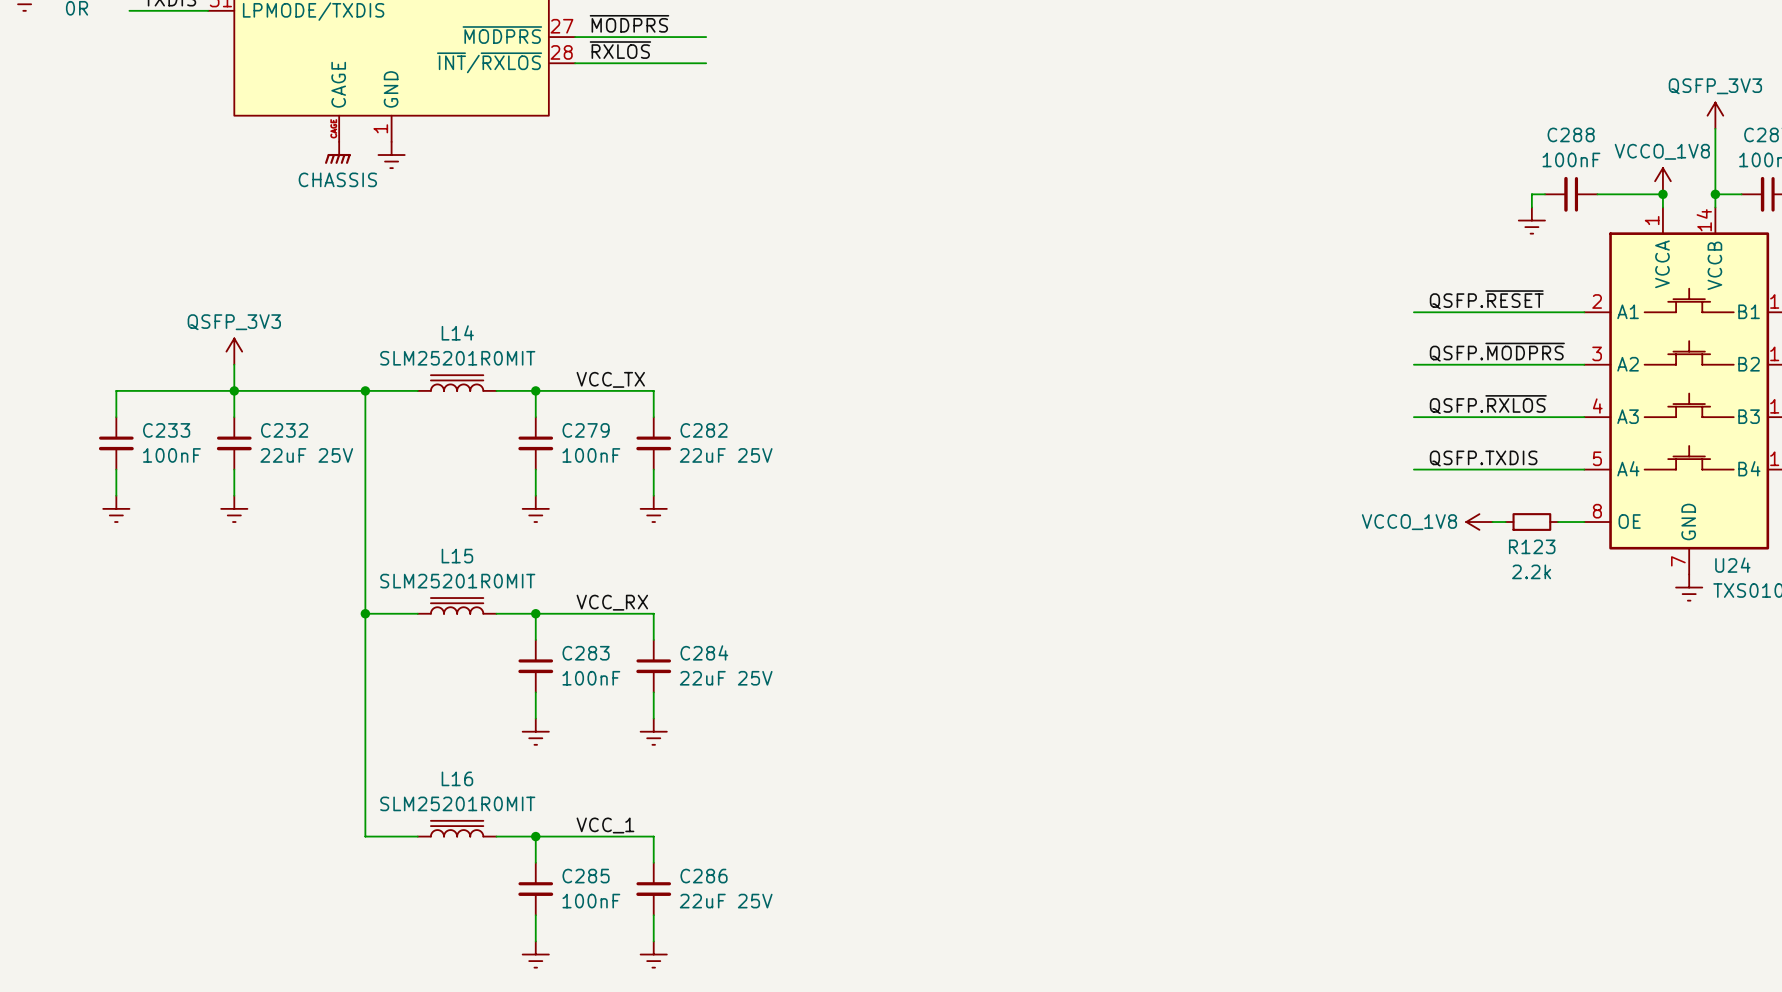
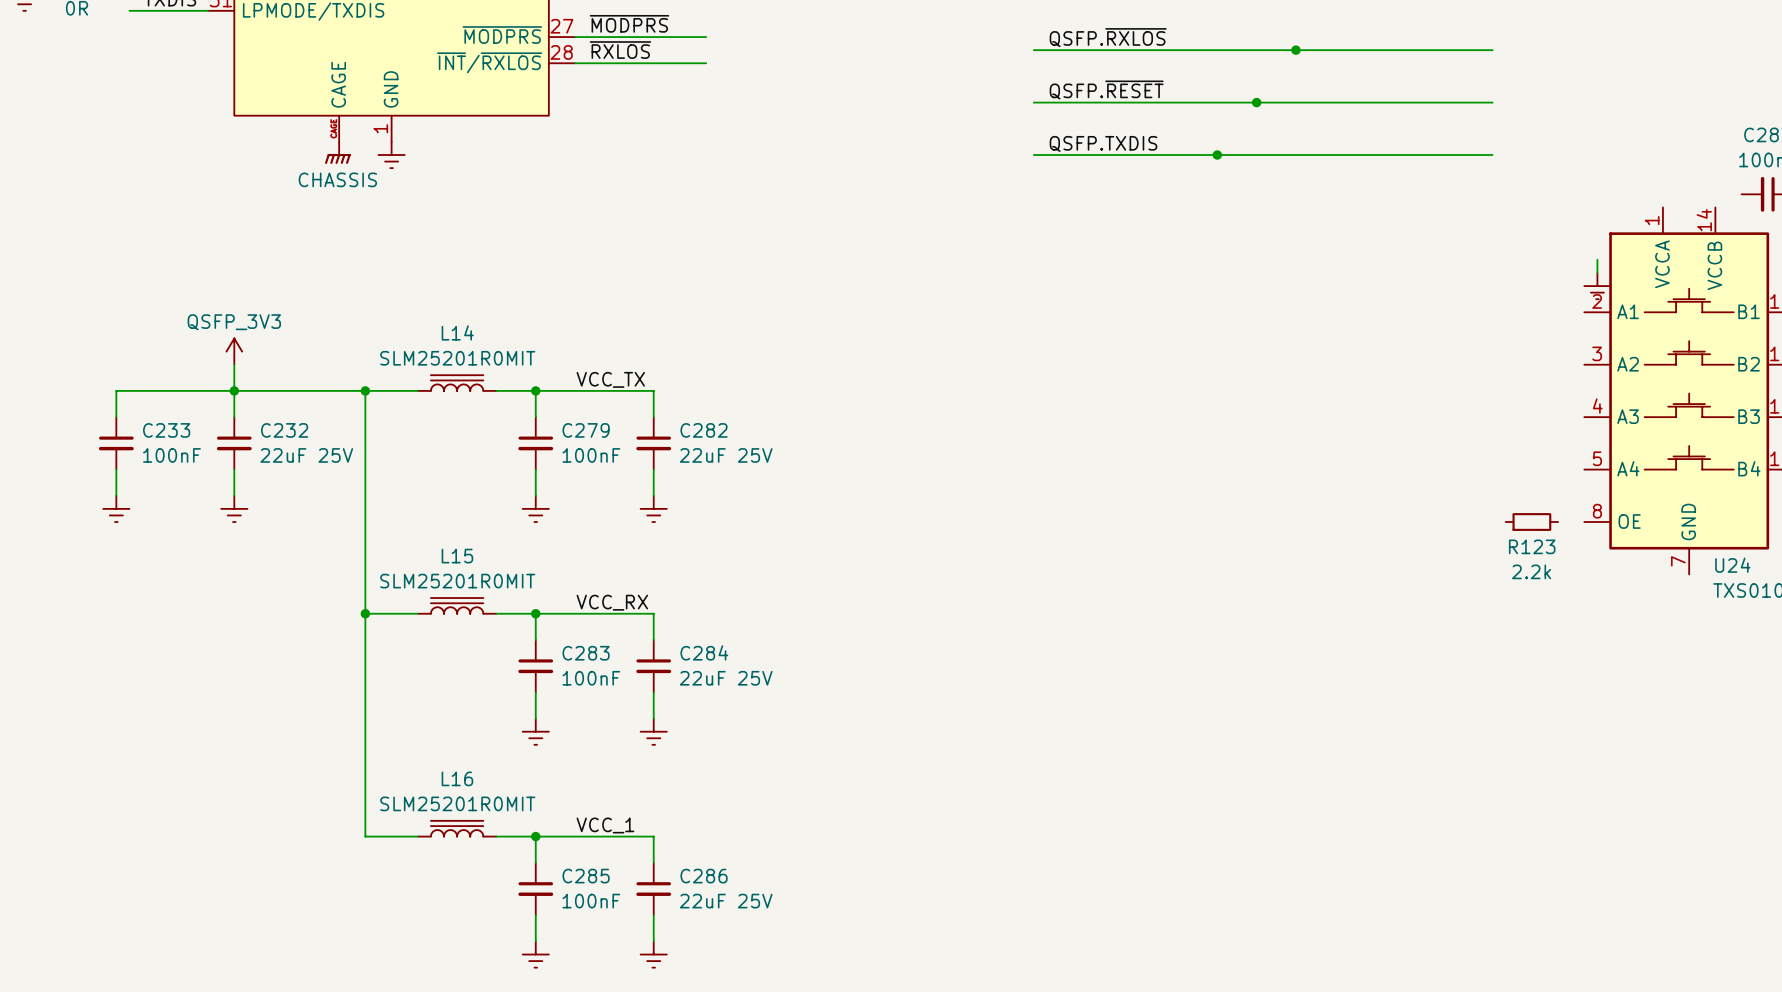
label: none -> QSFP.~{RXLOS} (1108, 37)
wire: none -> (1033, 50) (1492, 50)
junction: none -> (1295, 50)
label: none -> QSFP.~{RESET} (1106, 90)
wire: none -> (1033, 102) (1492, 102)
junction: none -> (1256, 102)
power symbol: QSFP_3V3 (1715, 115) -> none
wire: (1715, 128) (1715, 207) -> none
label: none -> QSFP.TXDIS (1103, 143)
wire: none -> (1033, 155) (1492, 155)
junction: none -> (1217, 155)
power symbol: VCCO_1V8 (1662, 181) -> none
wire: (1545, 194) (1531, 194) (1531, 207) -> none
C288: 100nF (1571, 194) -> none
wire: (1597, 194) (1662, 194) (1662, 207) -> none
junction: (1662, 194) -> none
wire: (1715, 194) (1741, 194) -> none
junction: (1715, 194) -> none
power symbol position: (1531, 220) -> (1597, 286)
wire: none -> (1597, 259) (1597, 272)
label: QSFP.~{RESET} (1486, 299) -> none
wire: (1413, 312) (1584, 312) -> none
label: QSFP.~{MODPRS} (1497, 352) -> none
wire: (1413, 364) (1584, 364) -> none
label: QSFP.~{RXLOS} (1488, 404) -> none
wire: (1413, 417) (1584, 417) -> none
label: QSFP.TXDIS (1483, 458) -> none
wire: (1413, 469) (1584, 469) -> none
power symbol: VCCO_1V8 (1479, 522) -> none
wire: (1492, 522) (1505, 522) -> none
wire: (1558, 522) (1584, 522) -> none
power symbol: (1689, 587) -> none

